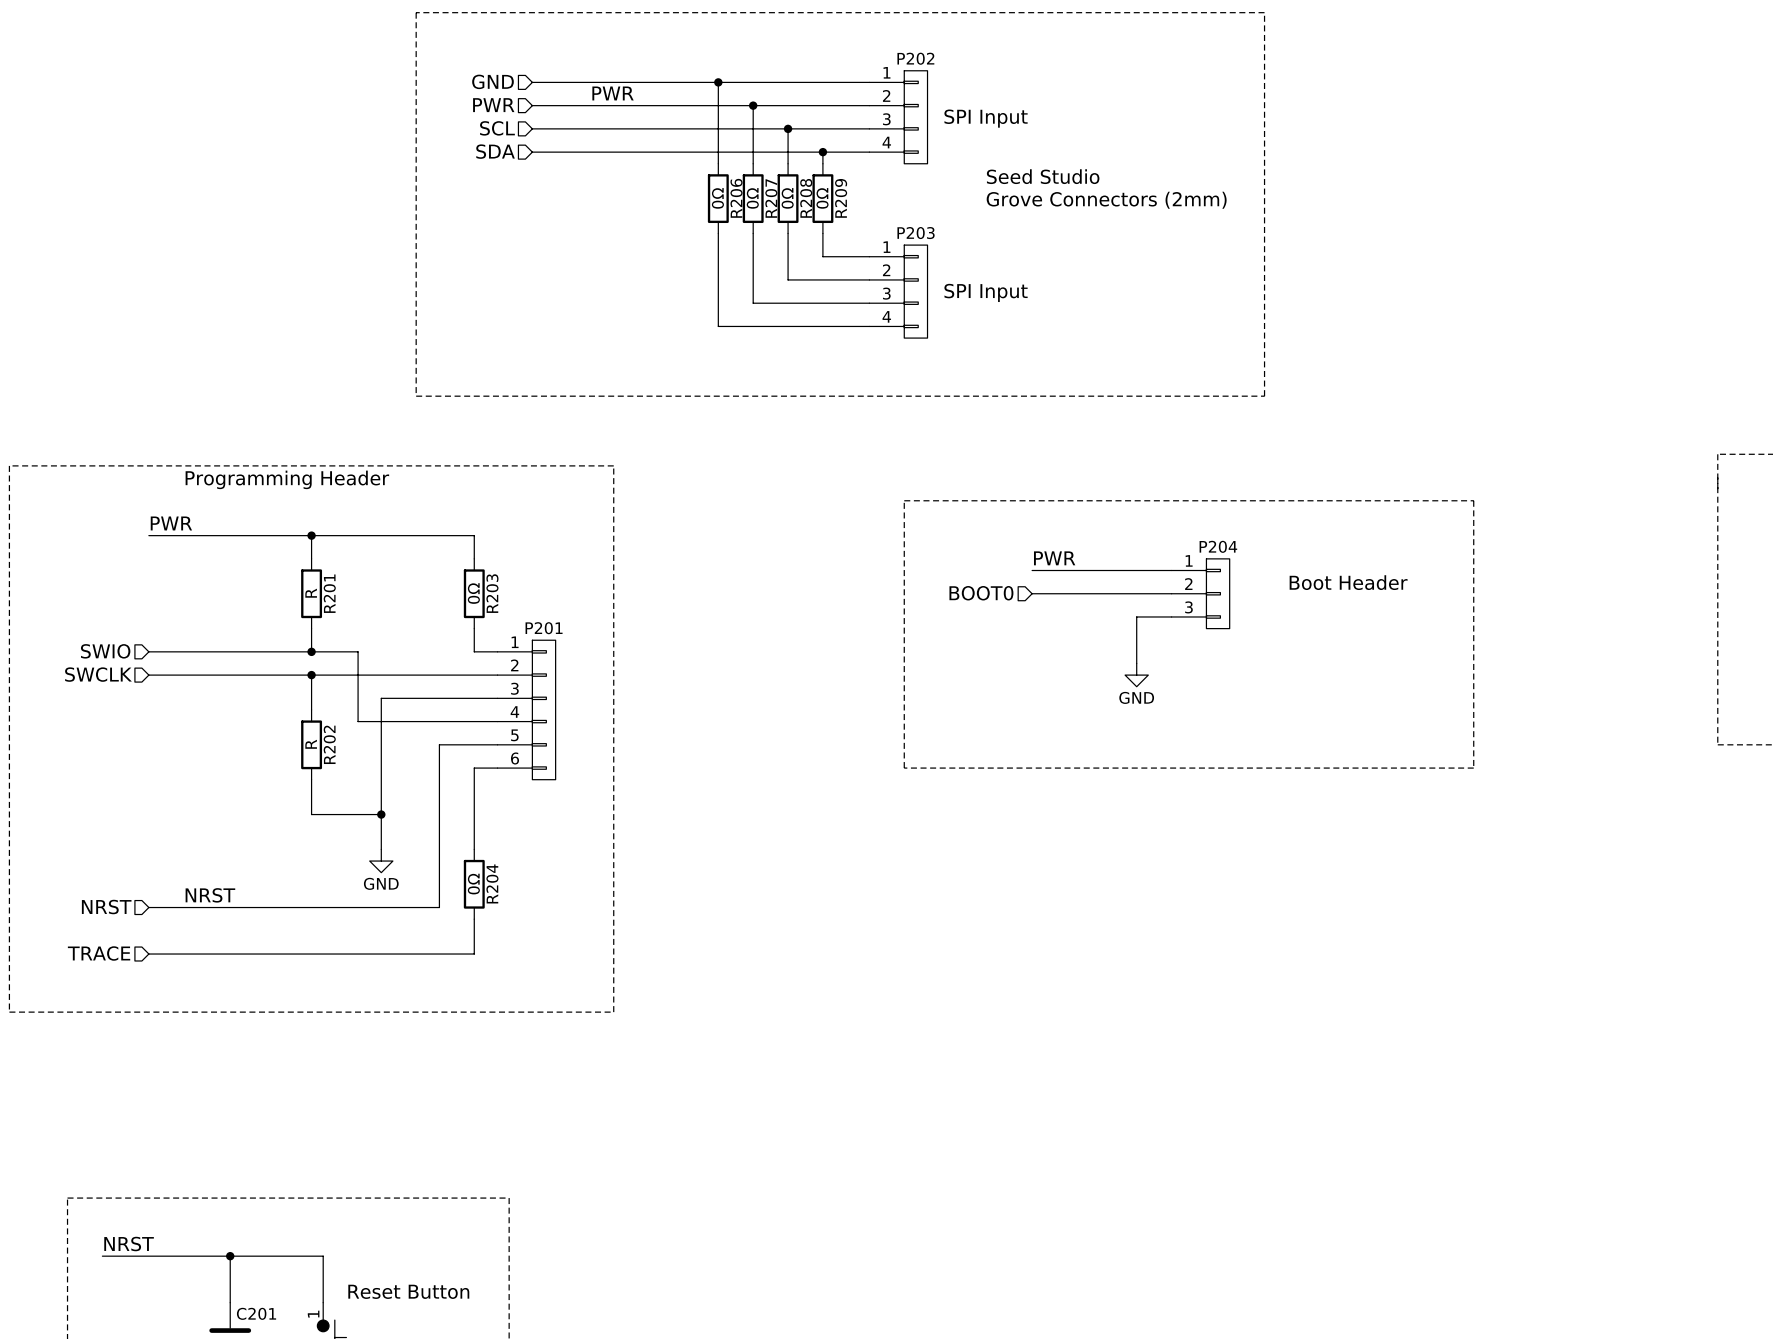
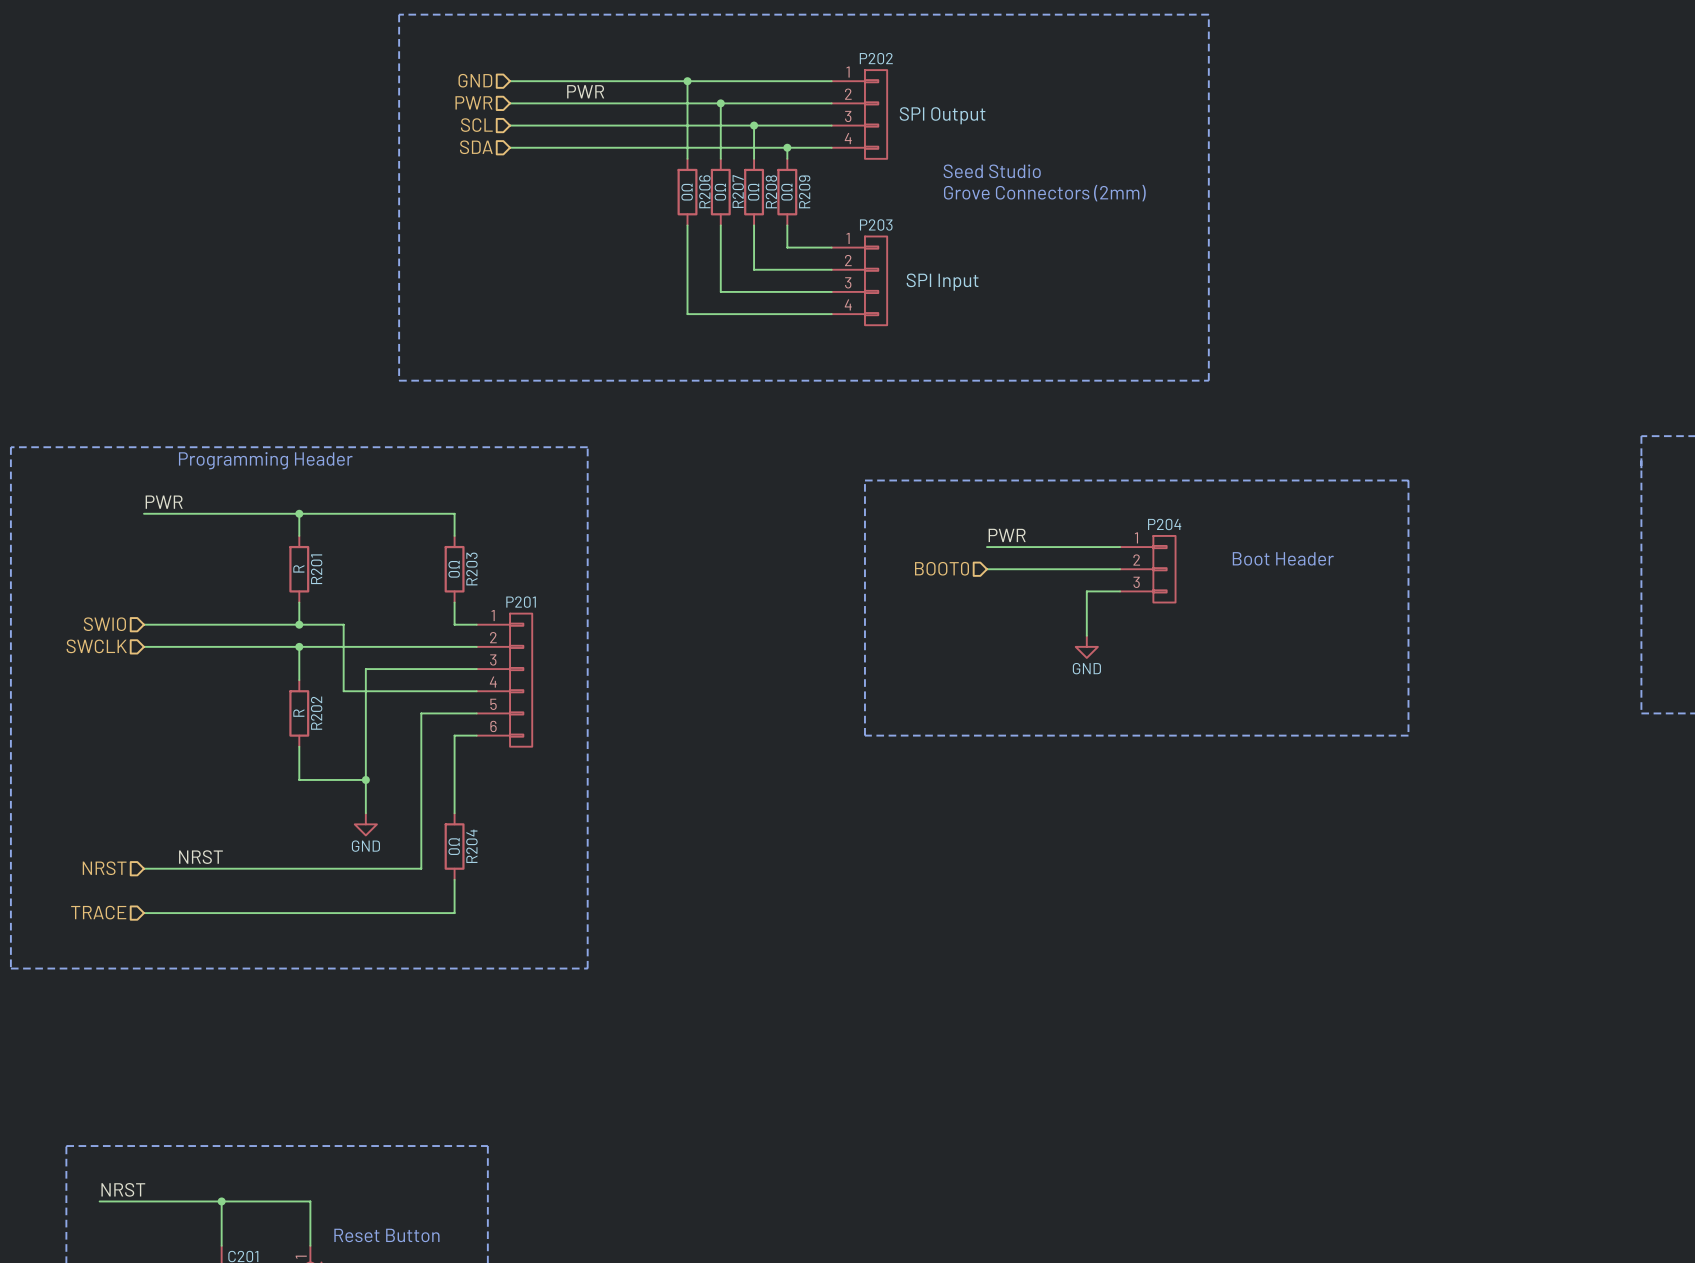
P202 text: SPI Input (986, 118) -> SPI Output (942, 115)

